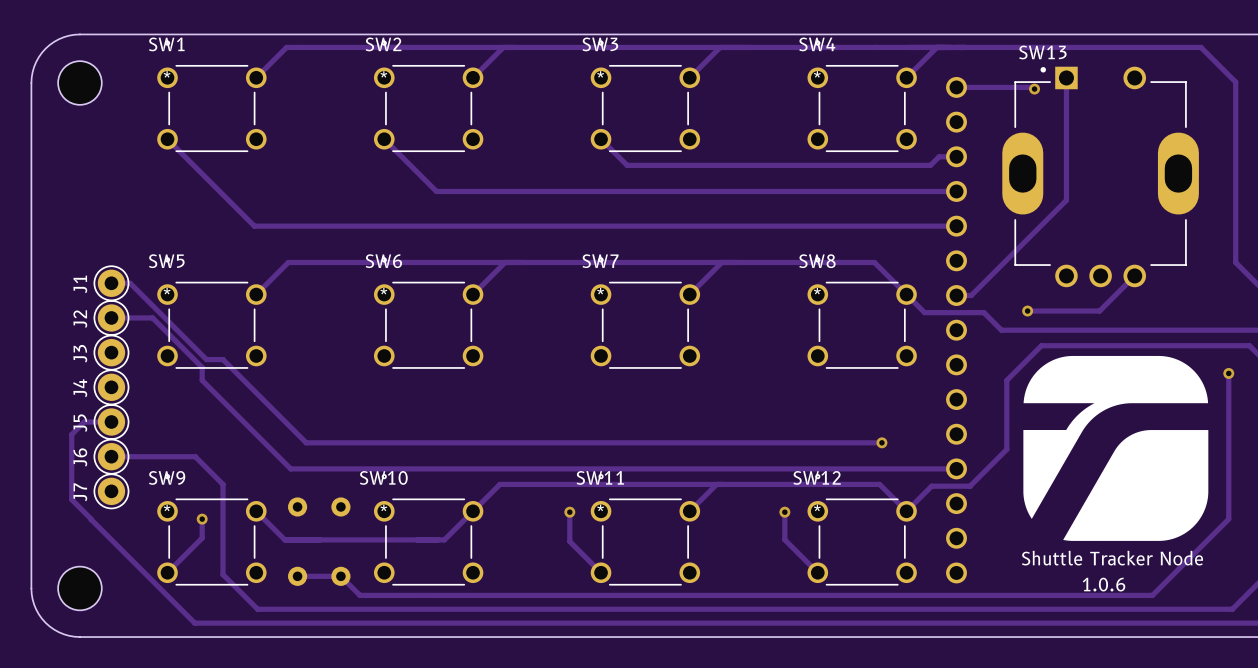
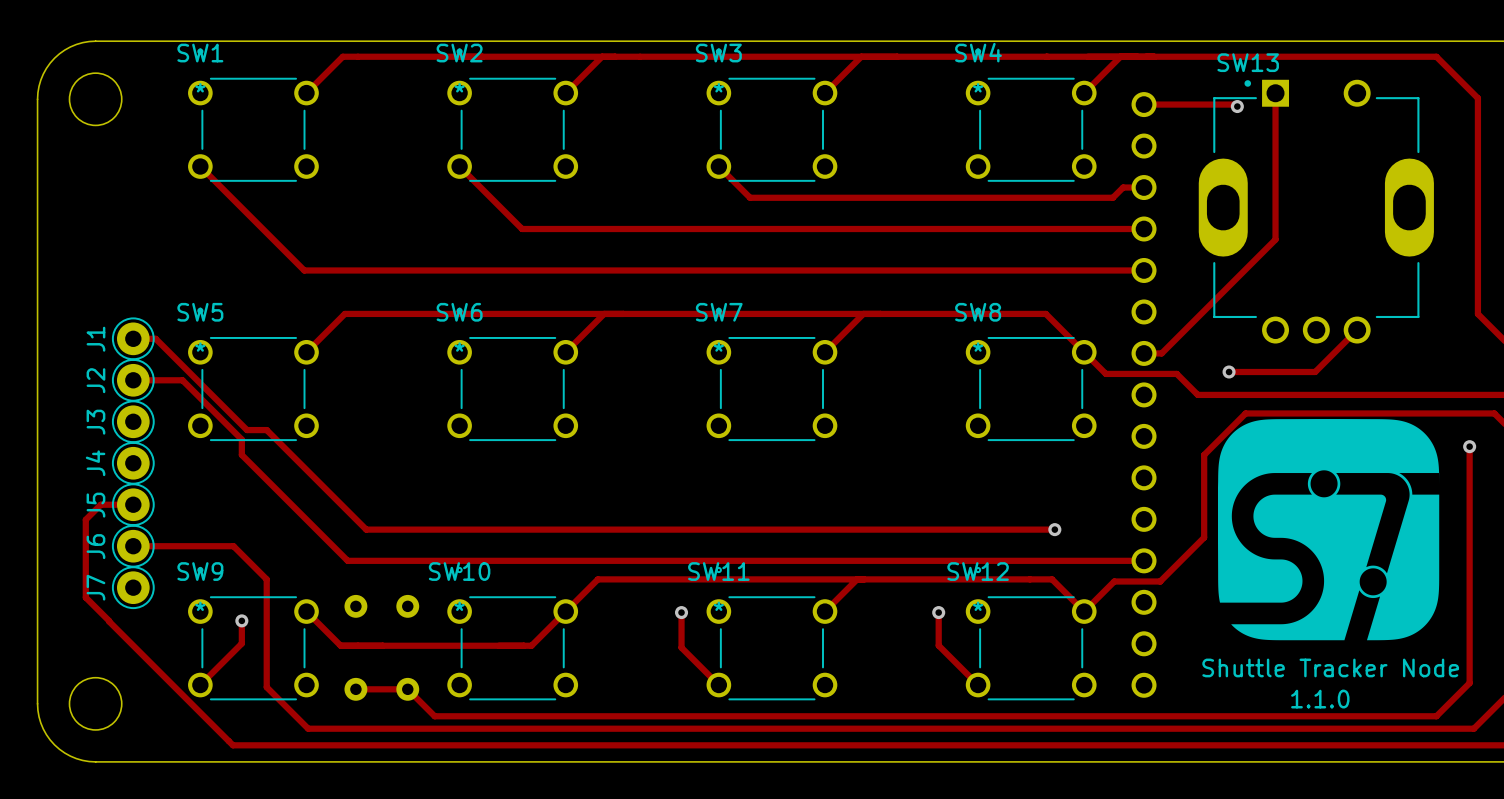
drawing shape: [1023, 355, 1209, 519] -> [1217, 419, 1440, 641]
drawing: [1063, 430, 1209, 541] -> none
track: (1228, 519) (1152, 595) (360, 595) -> (1469, 620) (1469, 683) (1436, 716) (434, 716) (430, 712)
text: 1.0.6 (1104, 584) -> 1.1.0 (1320, 699)

